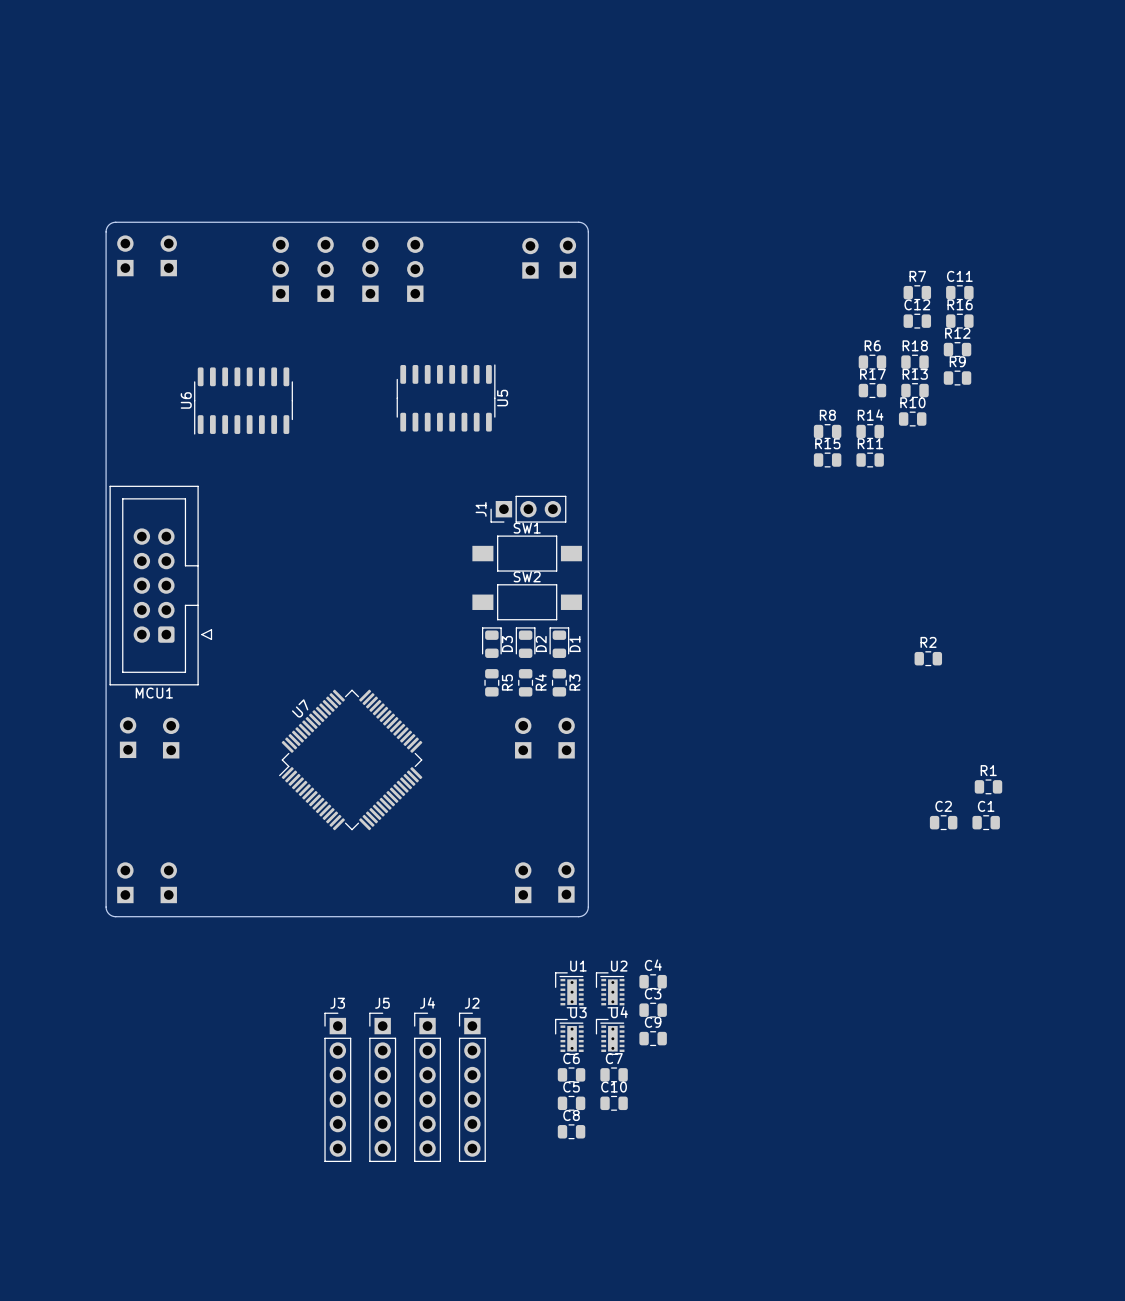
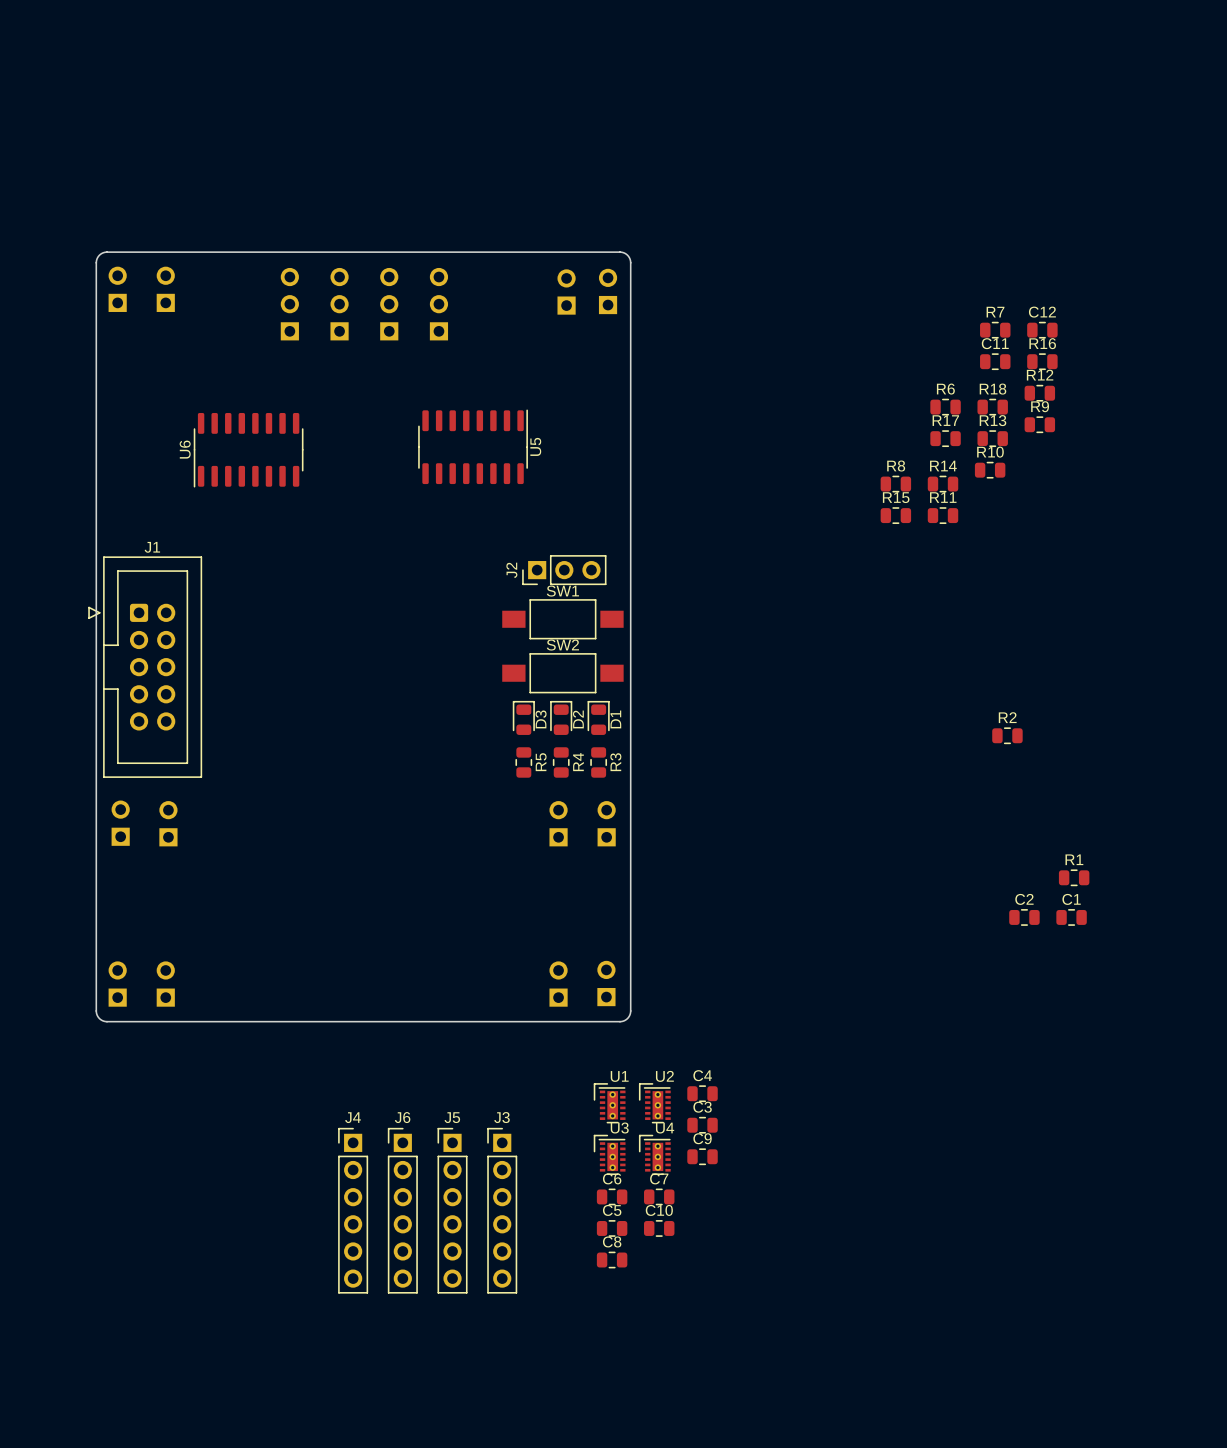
C11 name: C11 (959, 276) -> C12 (1042, 312)
C12 name: C12 (917, 304) -> C11 (995, 343)
J1 name: J1 (481, 509) -> J2 (511, 570)
MCU1: (160, 585) -> none
J1: none -> (145, 667)
U7: (350, 759) -> none
J3 name: J3 (337, 1003) -> J4 (353, 1117)
J5 name: J5 (382, 1003) -> J6 (402, 1117)
J4 name: J4 (427, 1003) -> J5 (452, 1117)
J2 name: J2 (472, 1003) -> J3 (502, 1117)

